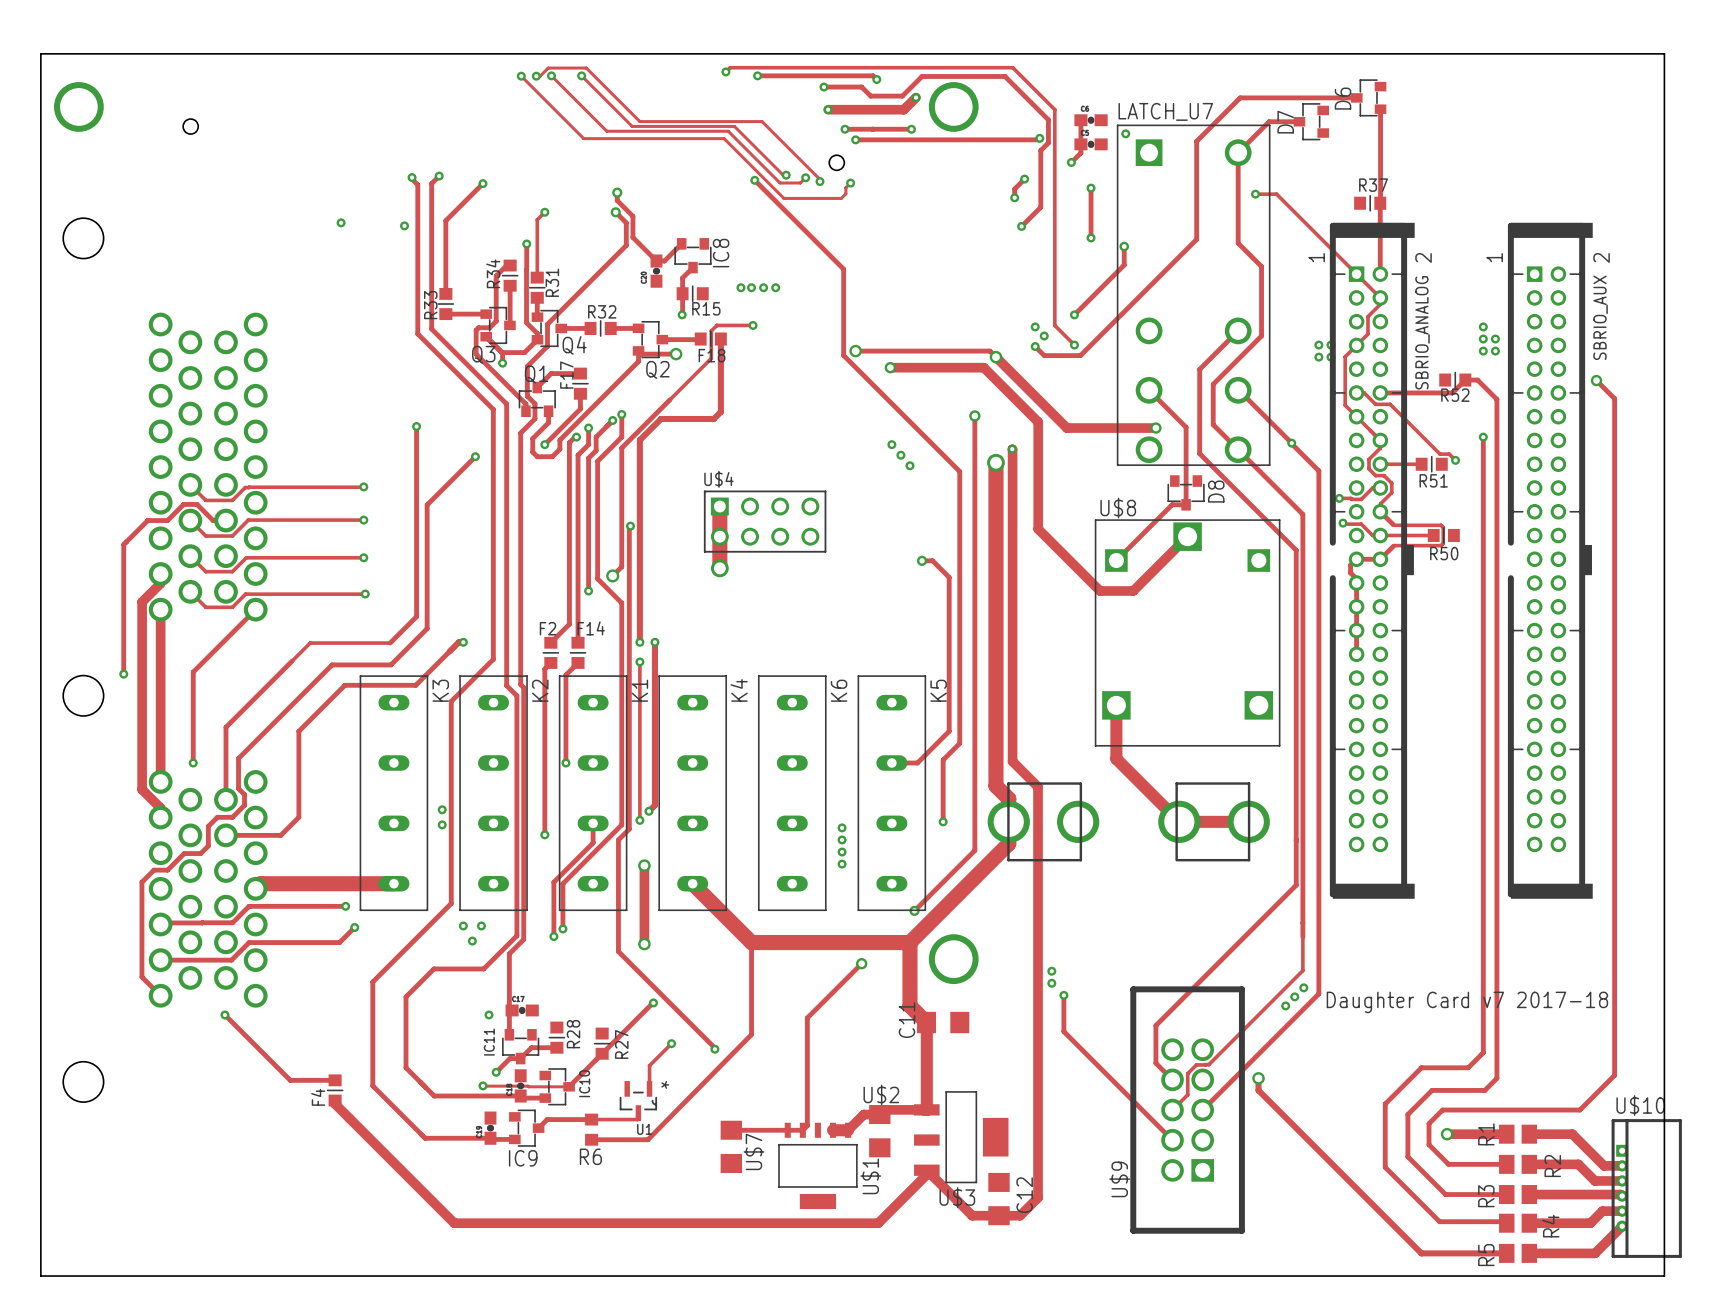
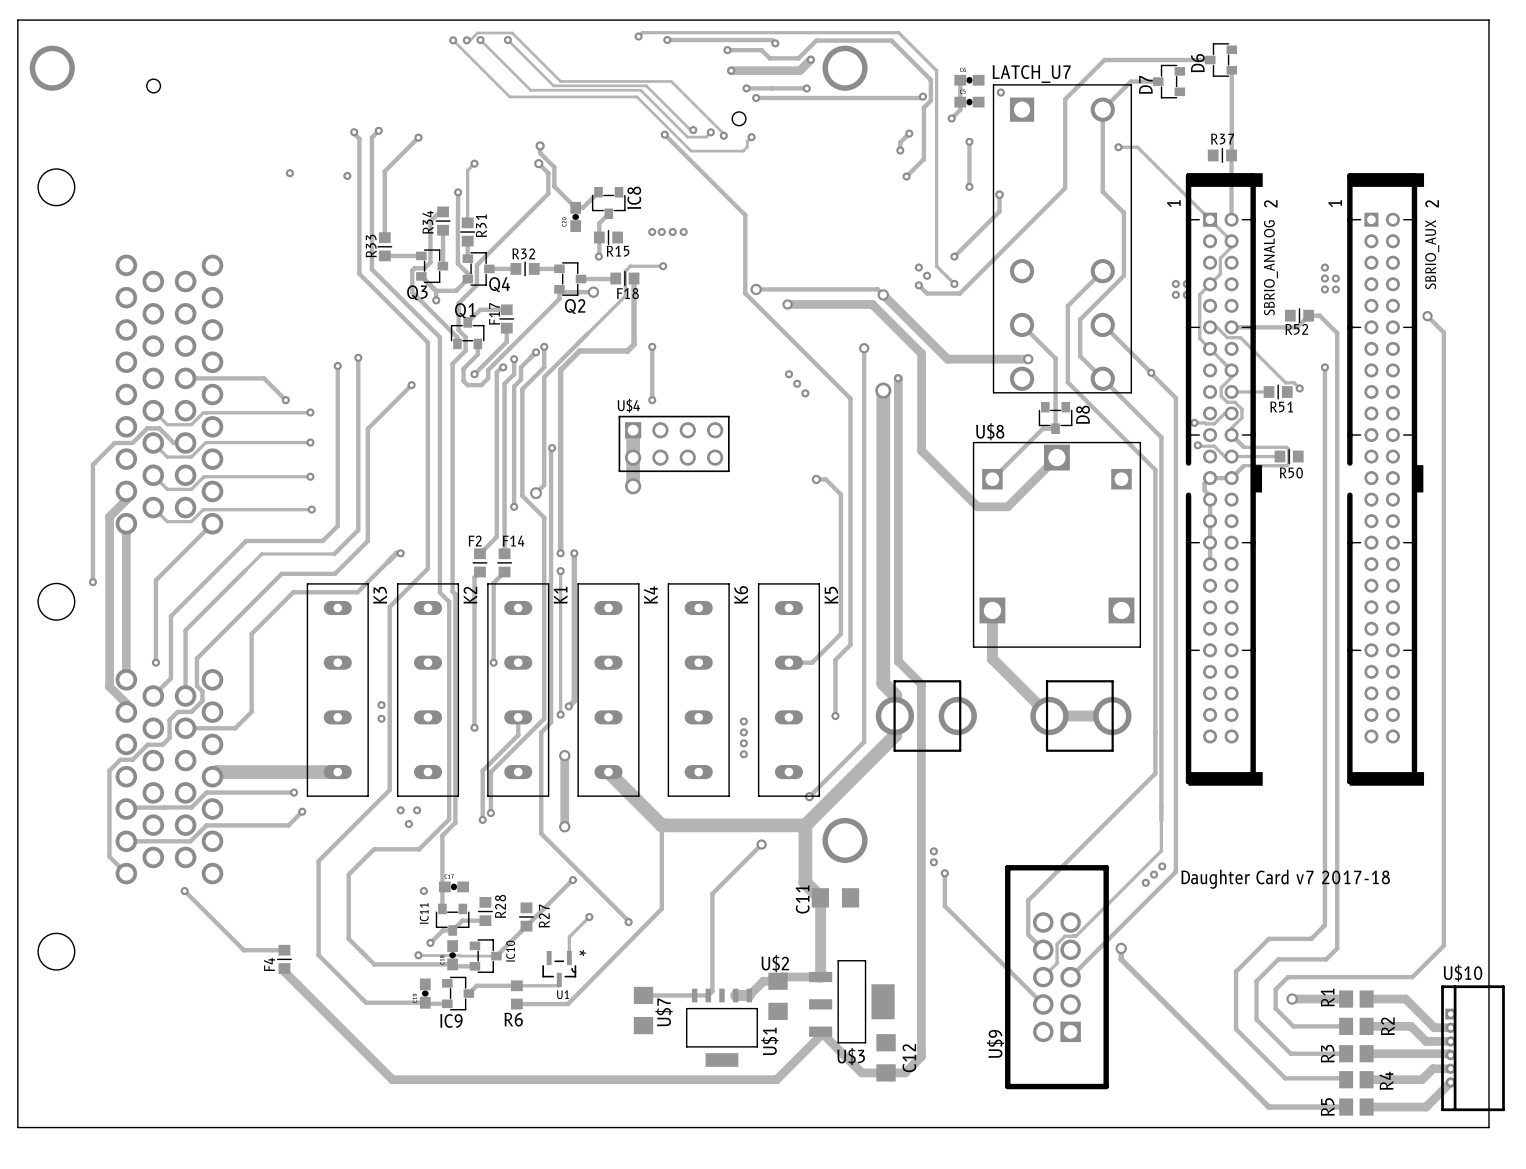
track: none -> (652, 346) (652, 400)
via: none -> (652, 346)
track: none -> (337, 366) (337, 525) (322, 541) (246, 541) (170, 616) (170, 678) (153, 695)
via: none -> (337, 366)
track: none -> (185, 378) (264, 378) (285, 400)
via: none -> (285, 400)
via: none -> (652, 400)

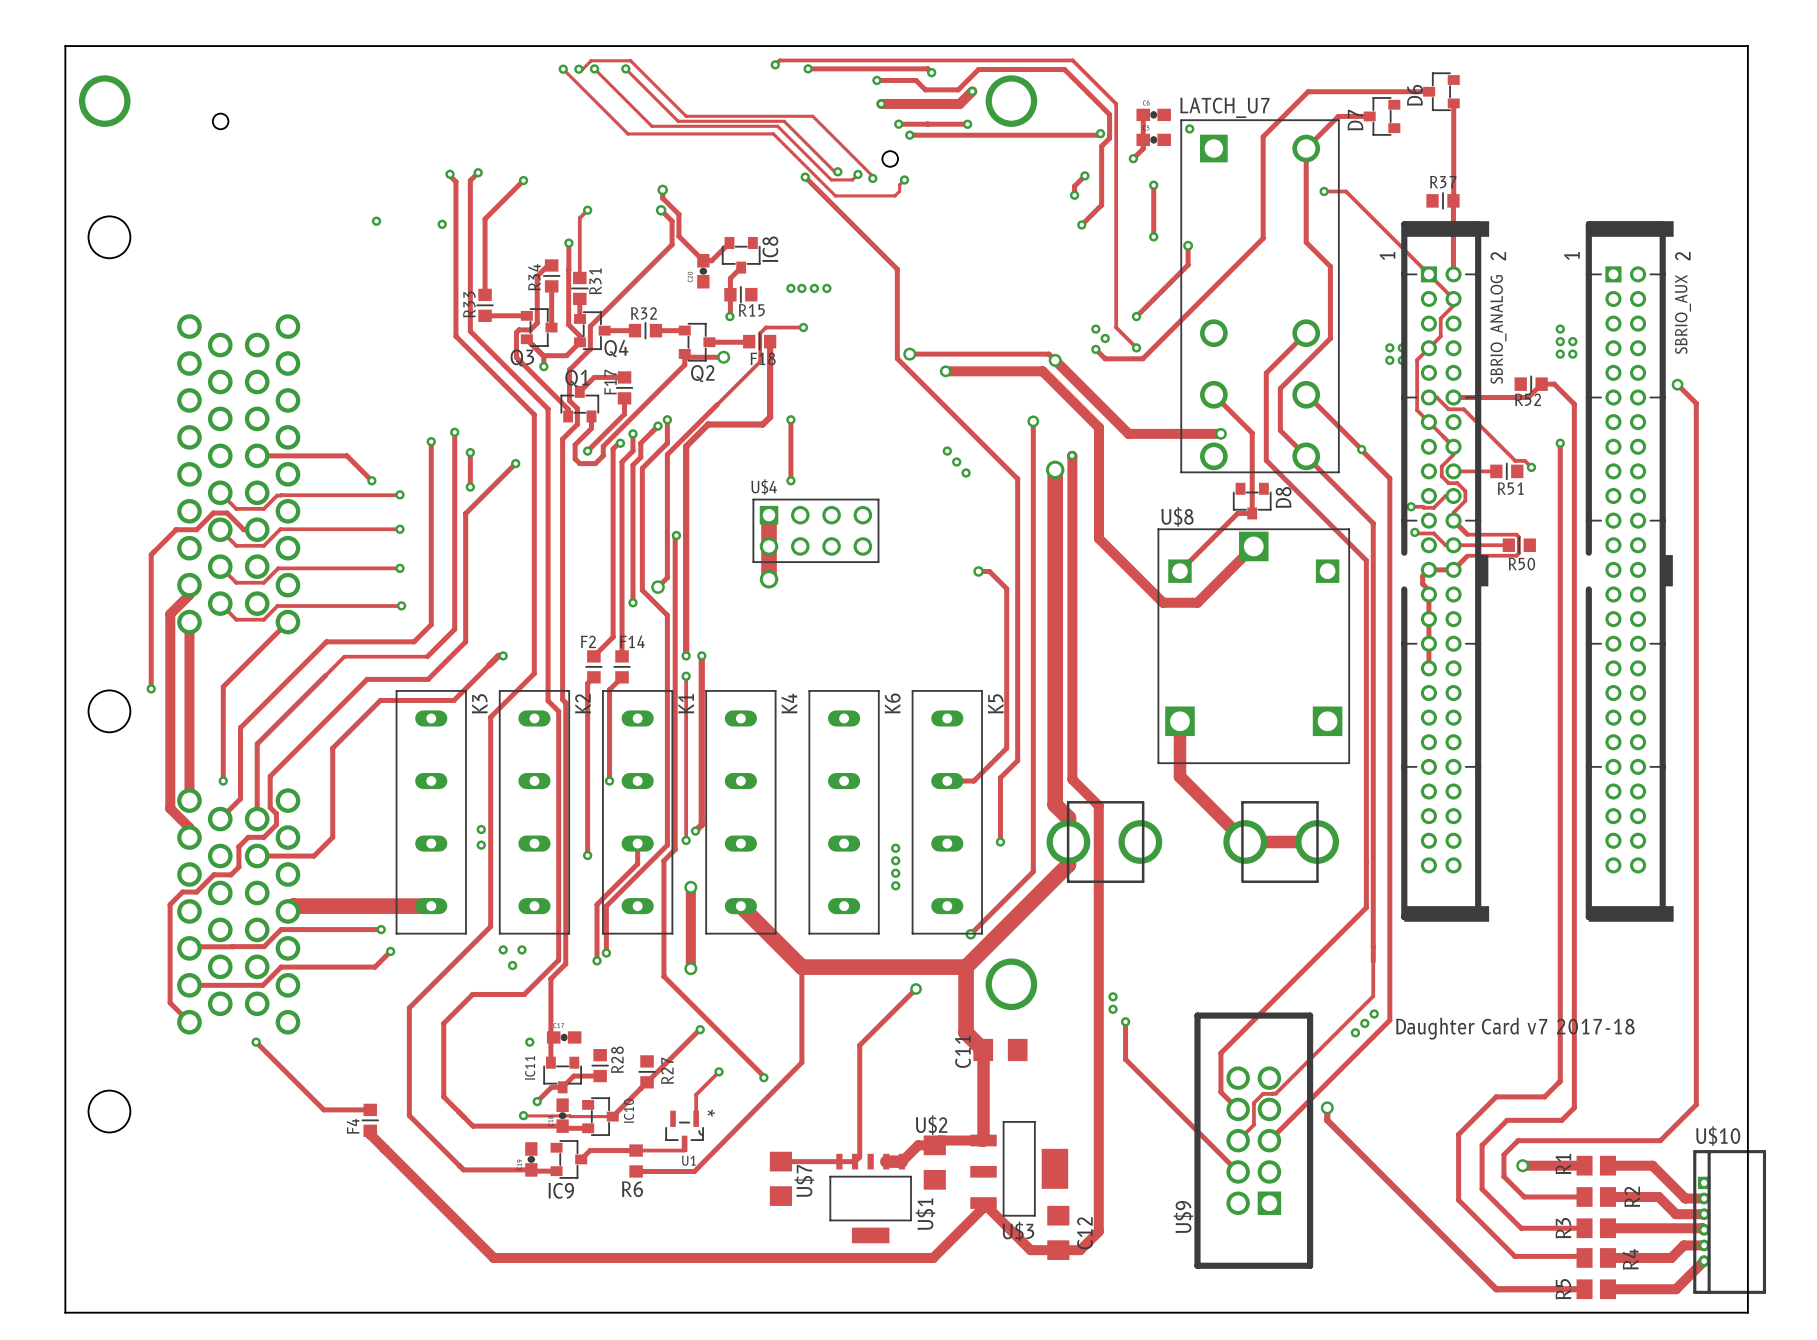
track: none -> (470, 452) (470, 487)
via: none -> (470, 452)
via: none -> (470, 487)

